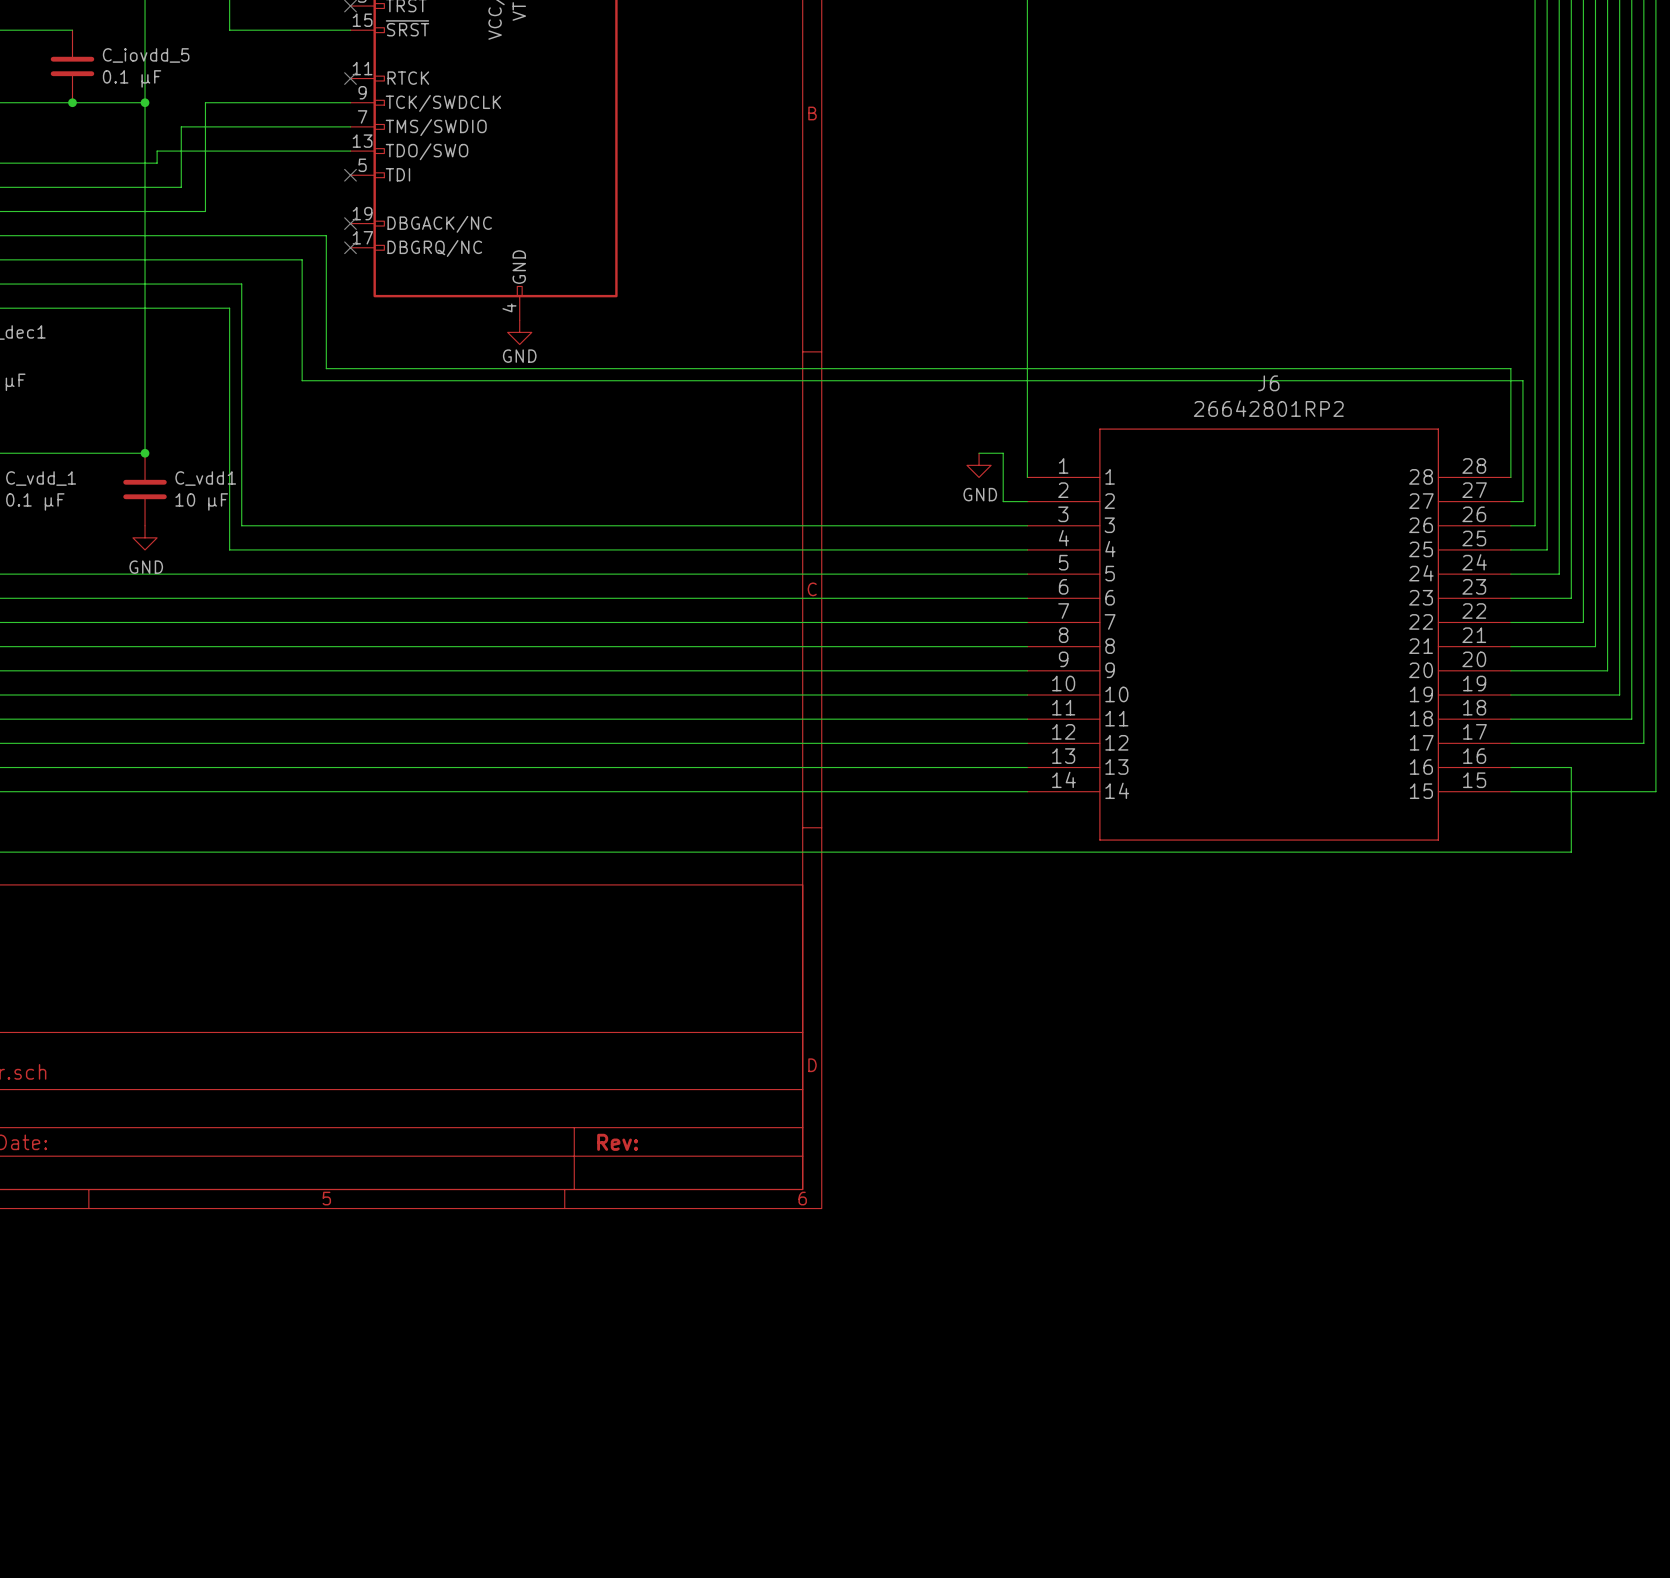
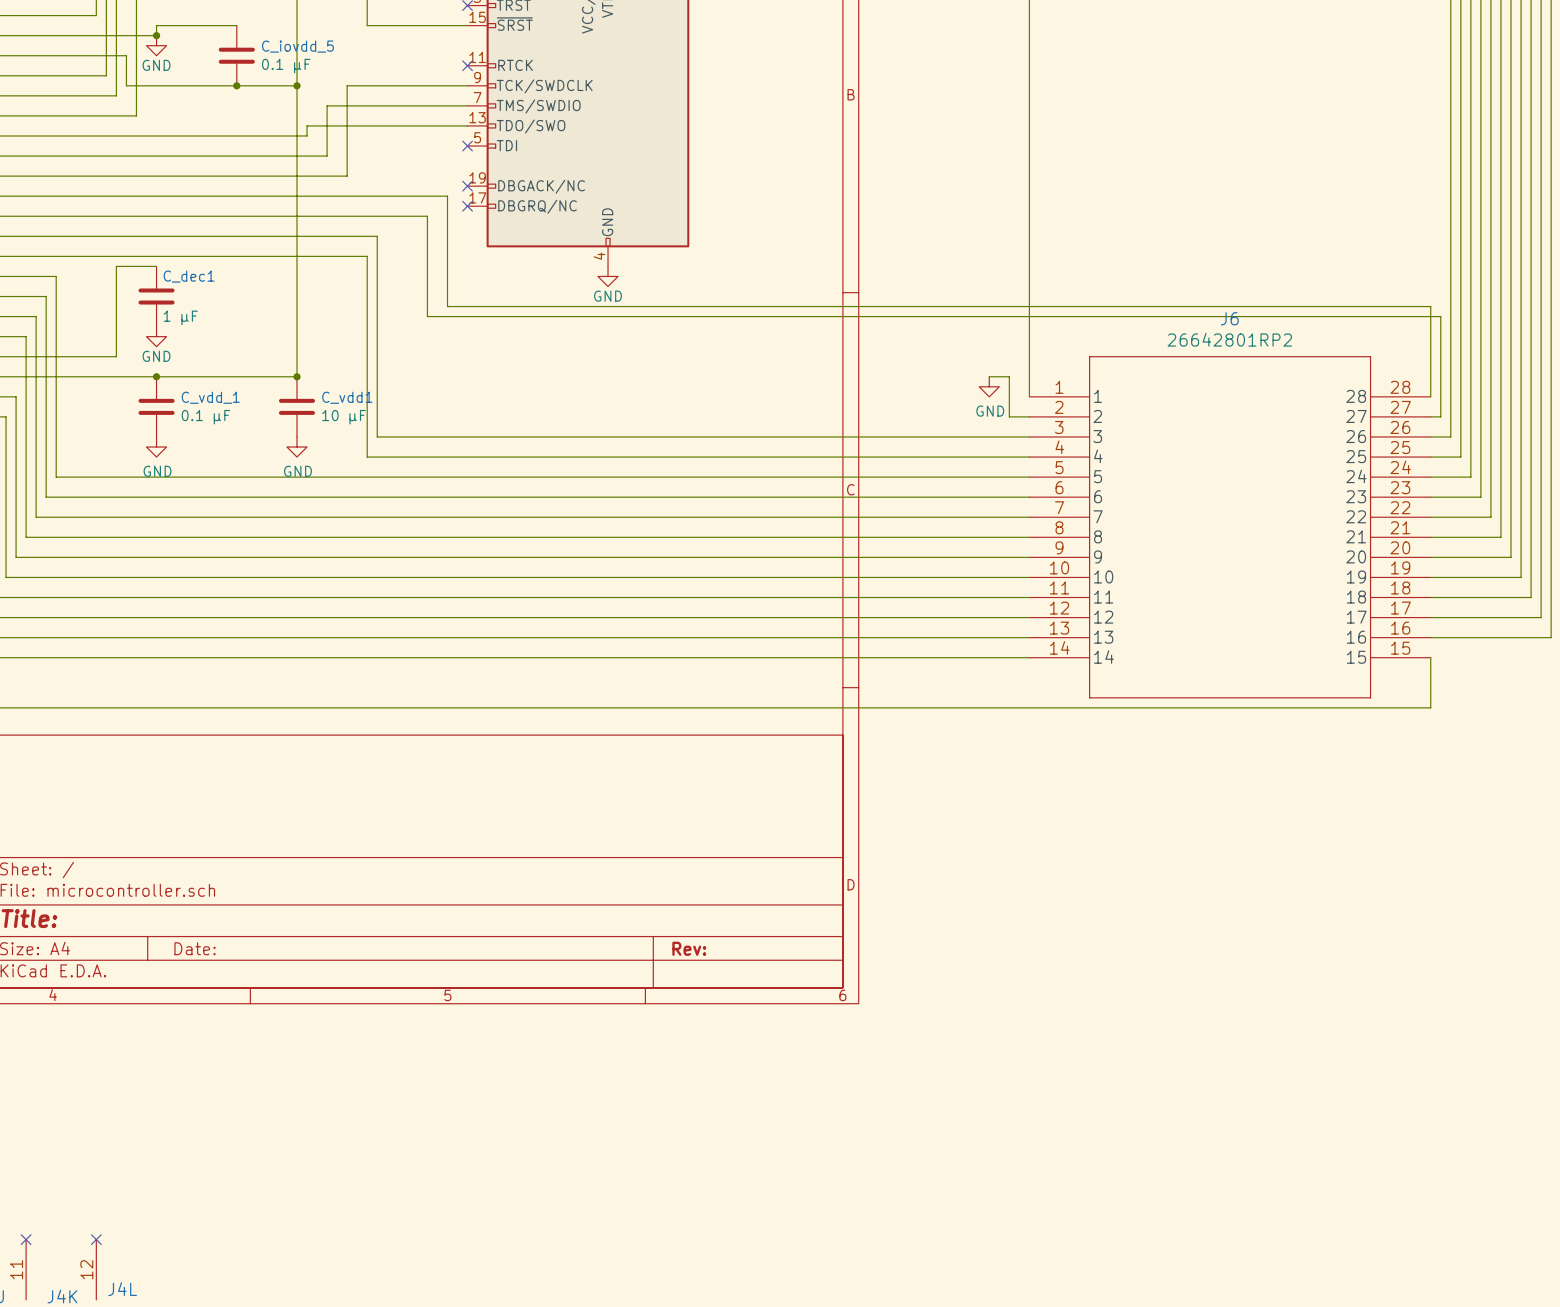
wire: (1571, 767) (1571, 852) (1510, 852) -> (1430, 657) (1430, 707)
wire: (1655, 767) (1655, 791) (1510, 791) -> (1551, 637) (1480, 637)

